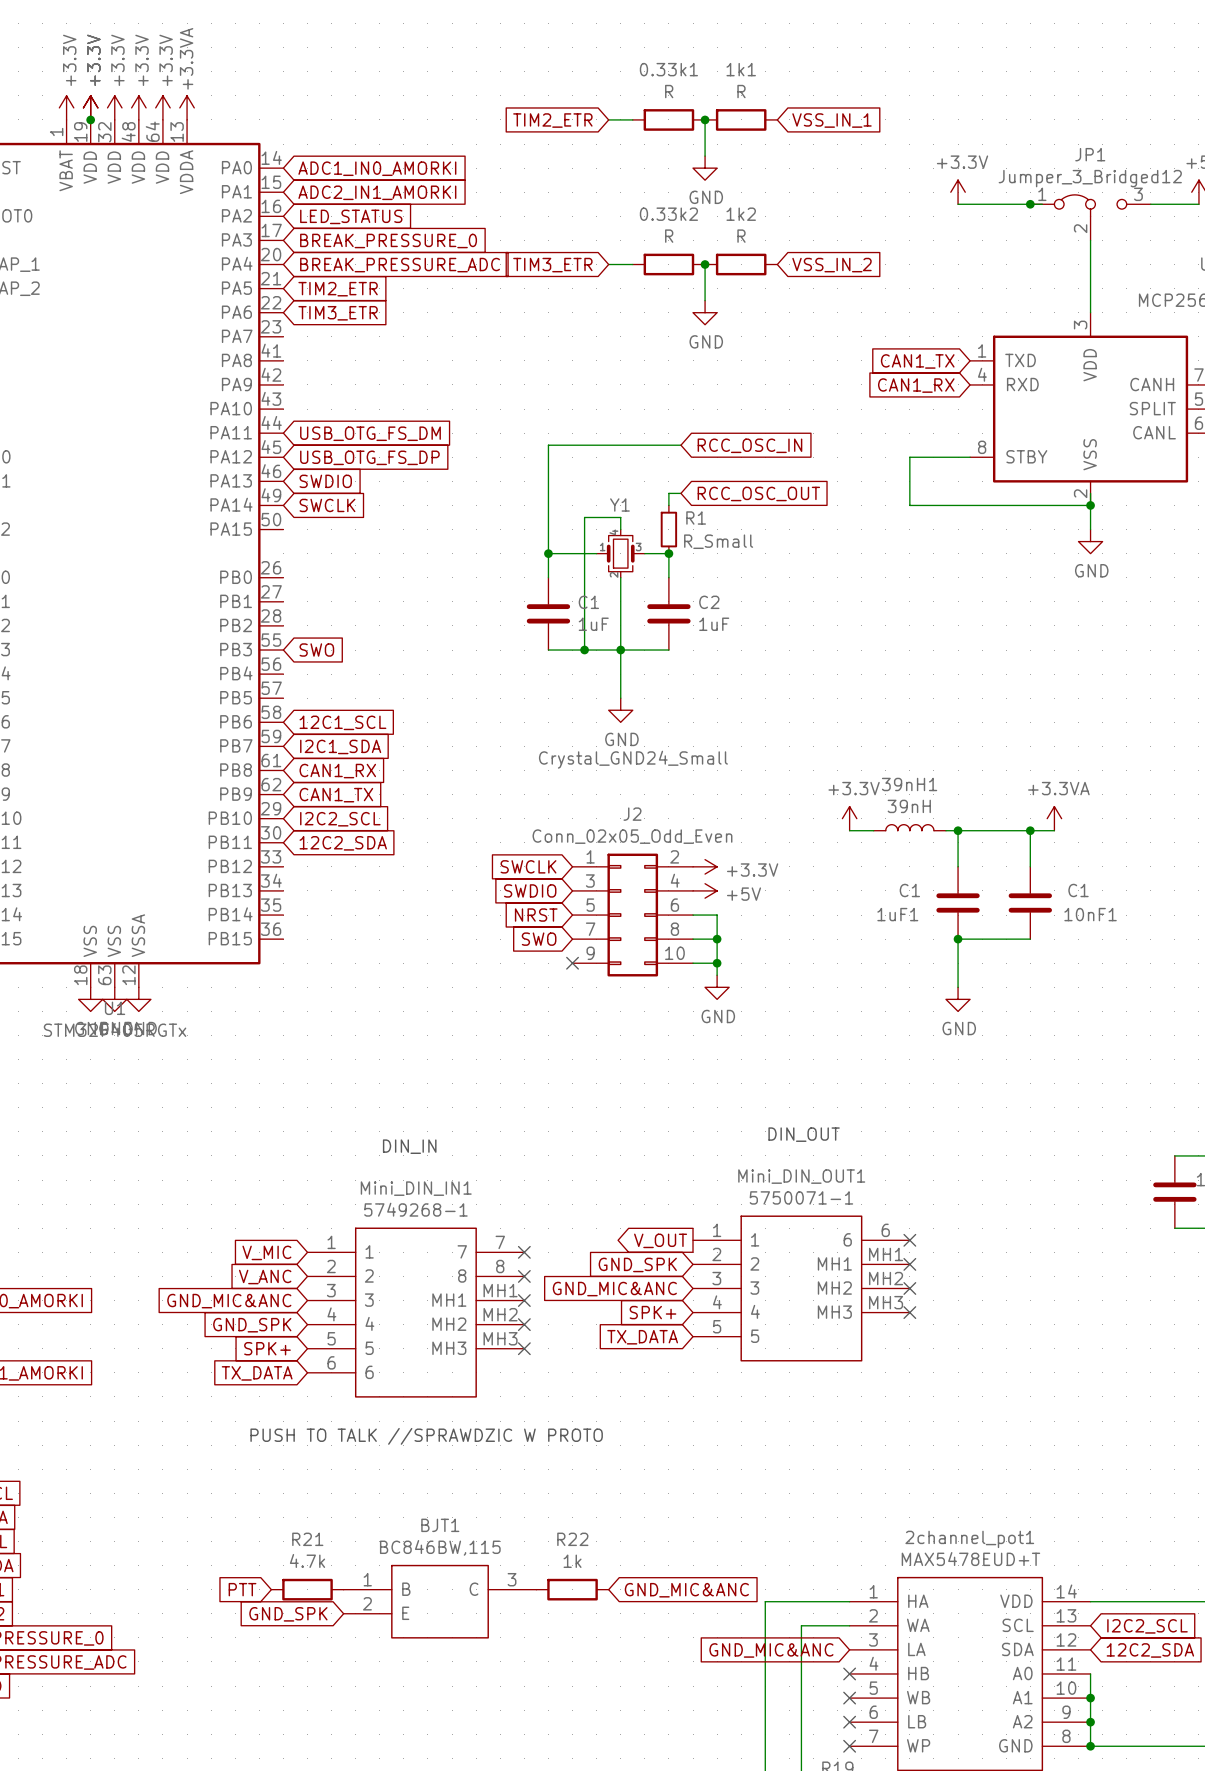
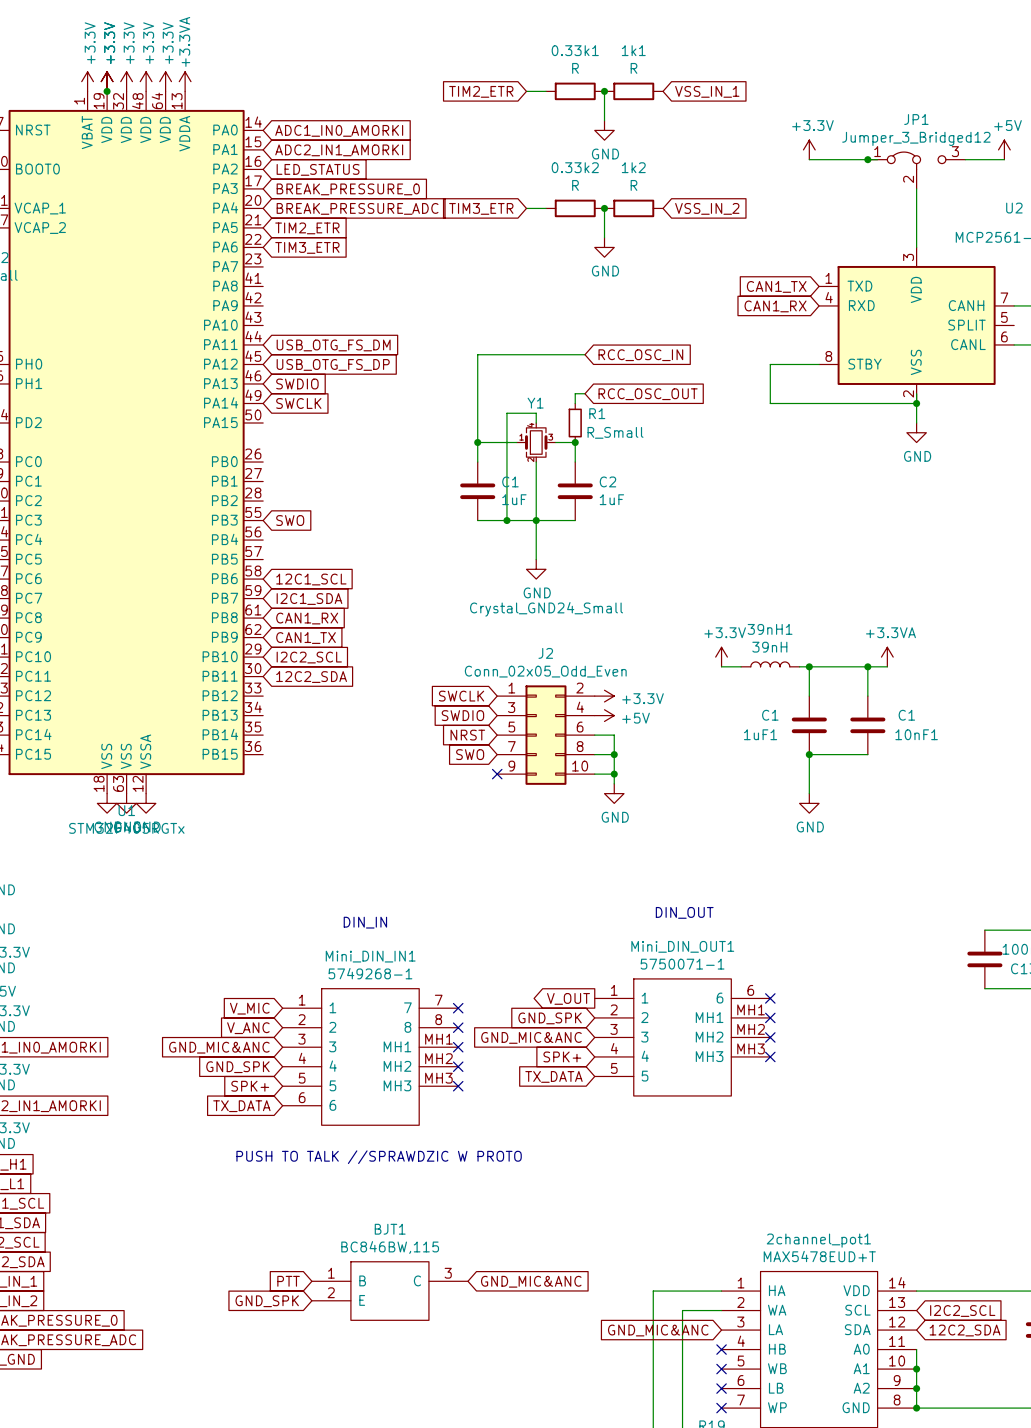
global label position: PTT (242, 1589) -> PTT (288, 1281)
R21: 4.7k (307, 1589) -> none
R22: 1k (572, 1589) -> none
global label position: GND_MIC&ANC (686, 1590) -> GND_MIC&ANC (531, 1281)

